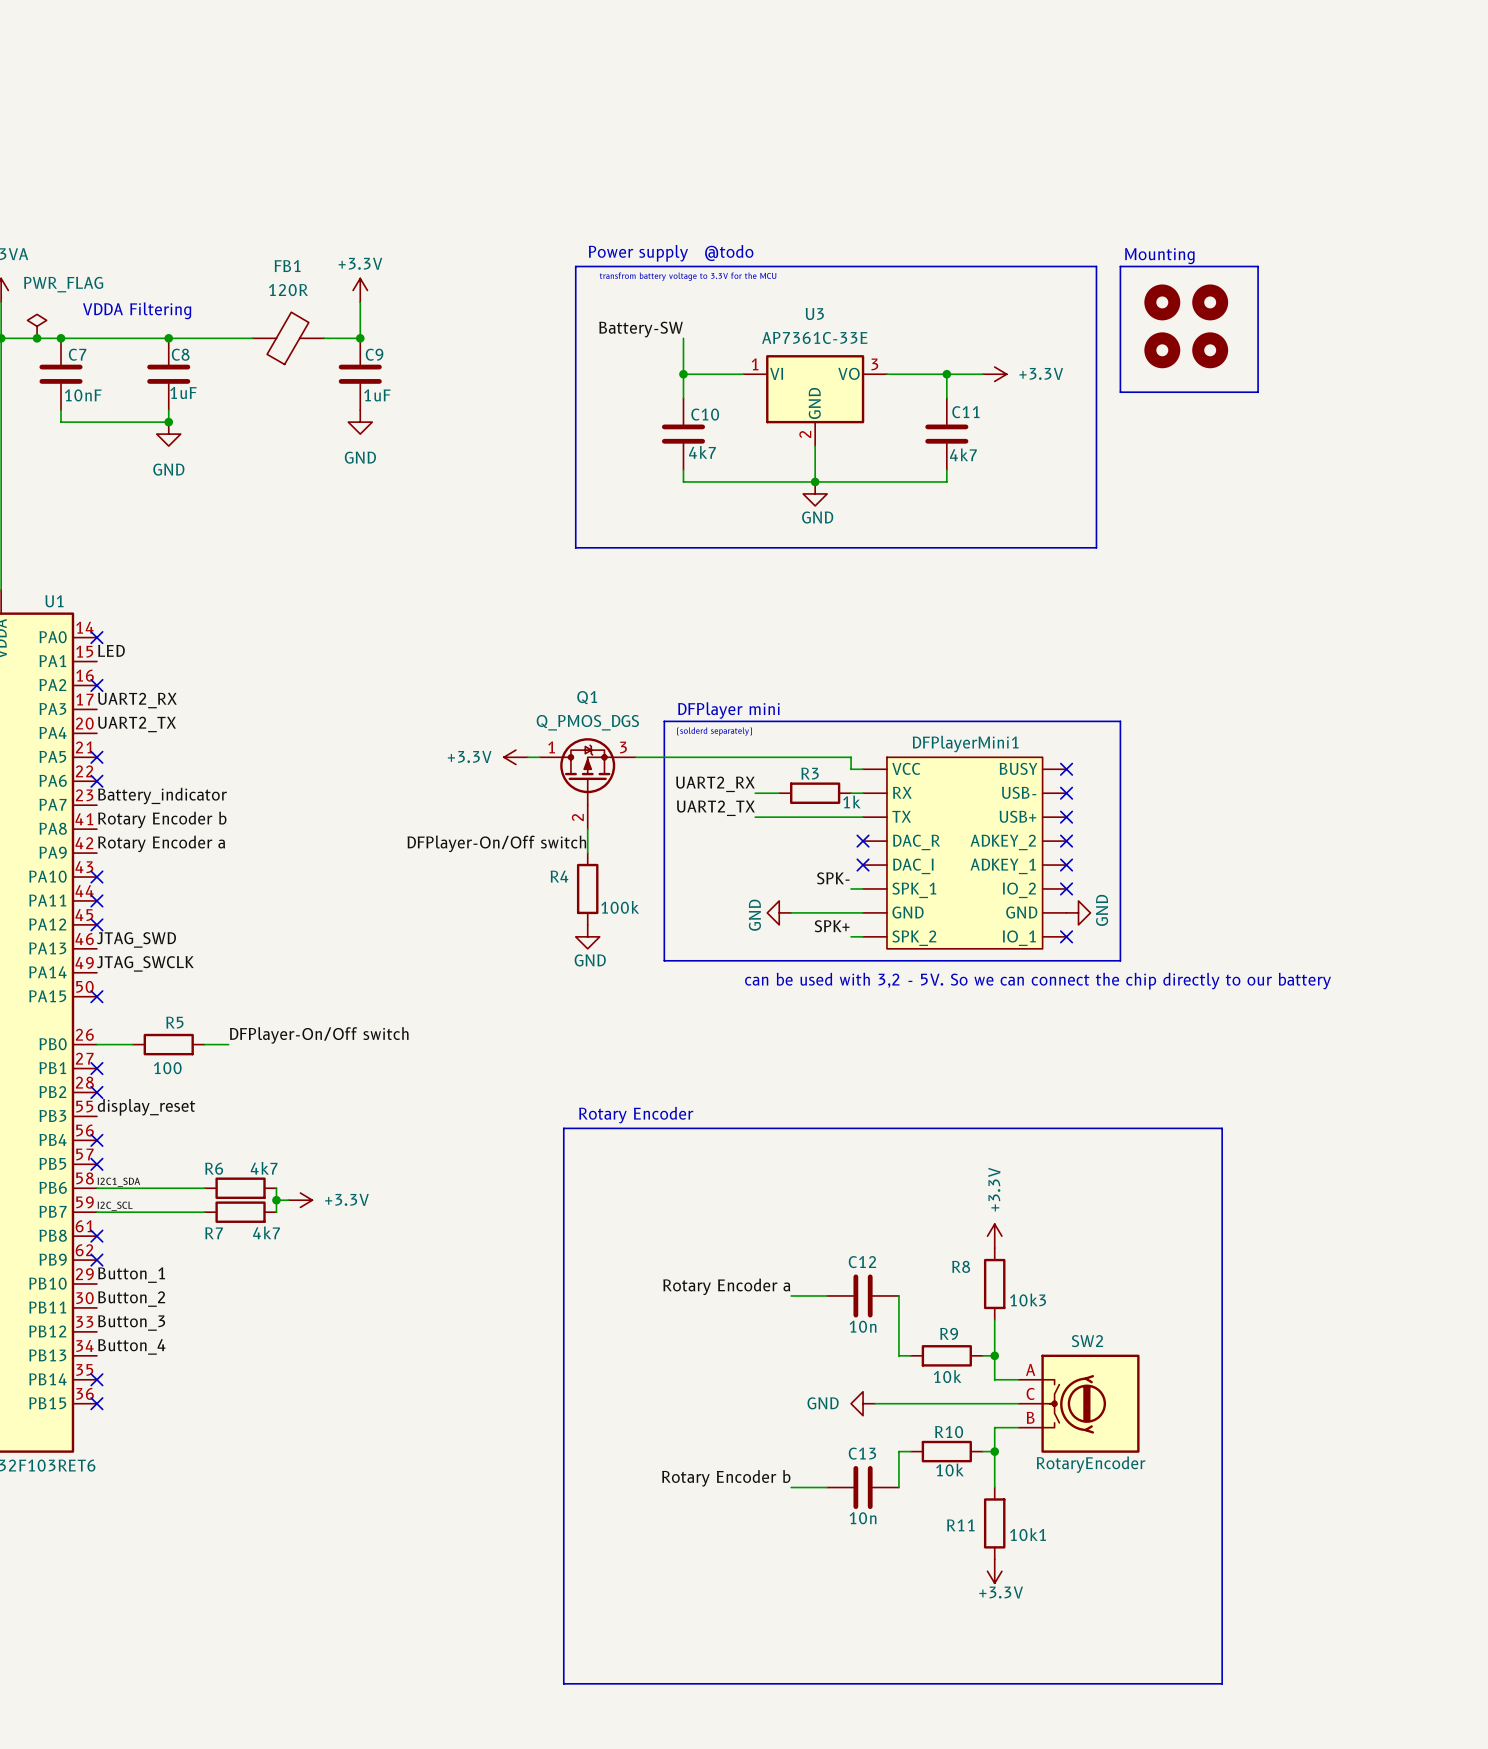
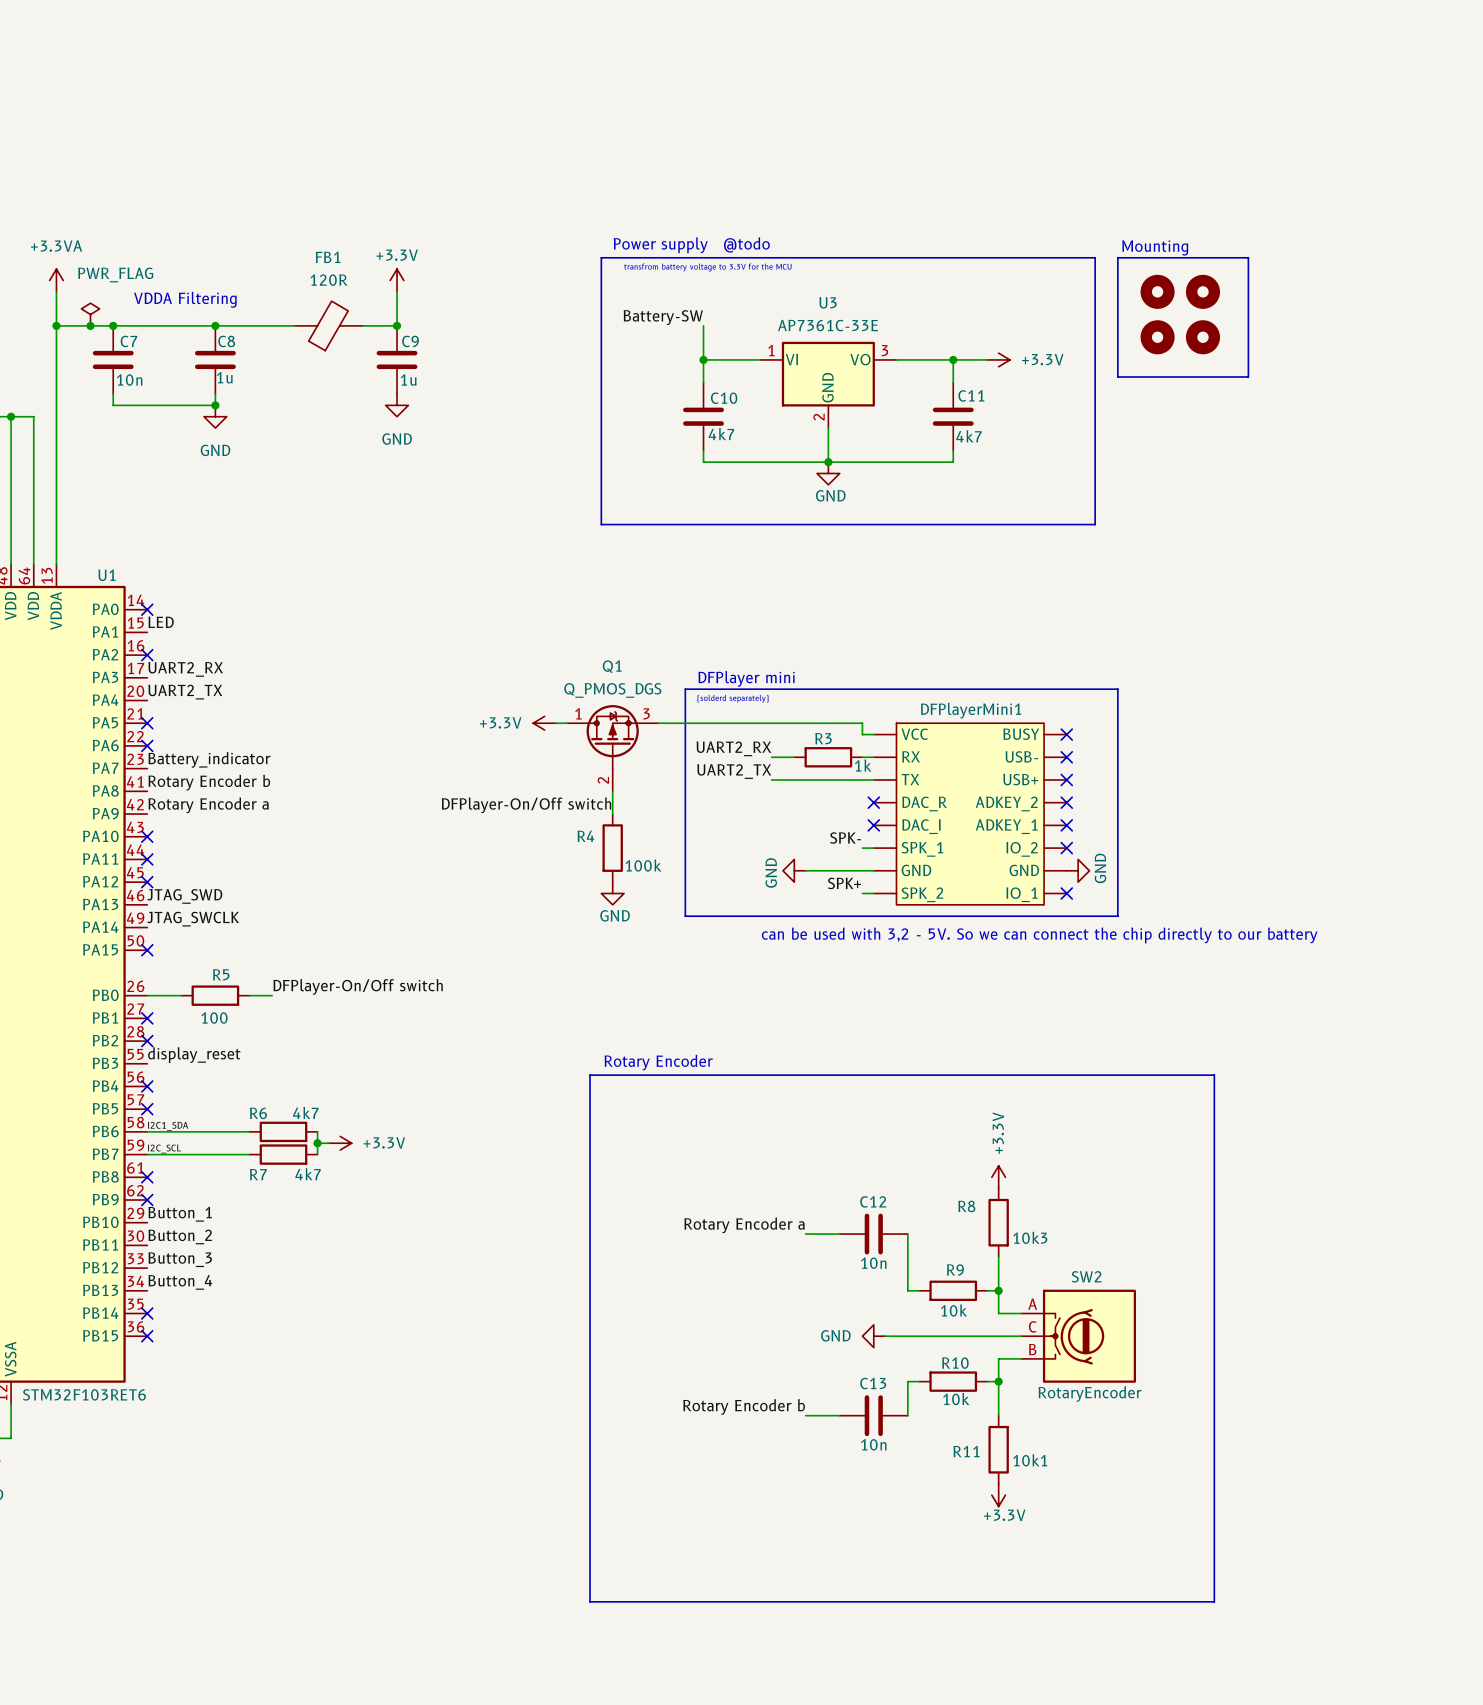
C8 value: 1uF (183, 393) -> 1u (224, 377)
C7 value: 10nF (83, 395) -> 10n (129, 380)
C9 value: 1uF (377, 395) -> 1u (408, 380)

